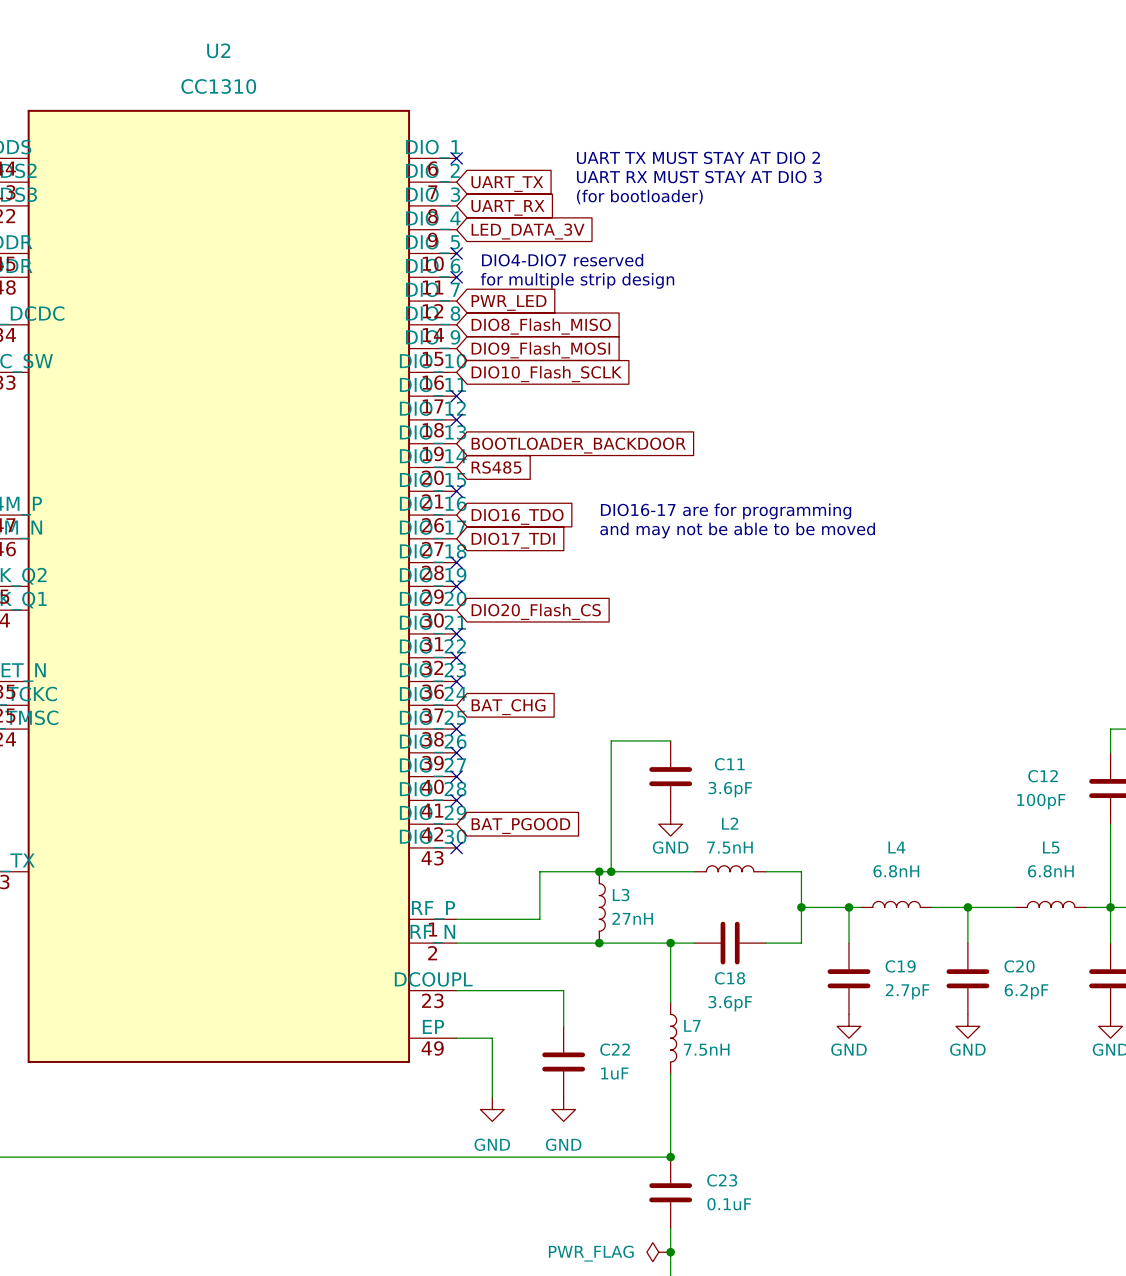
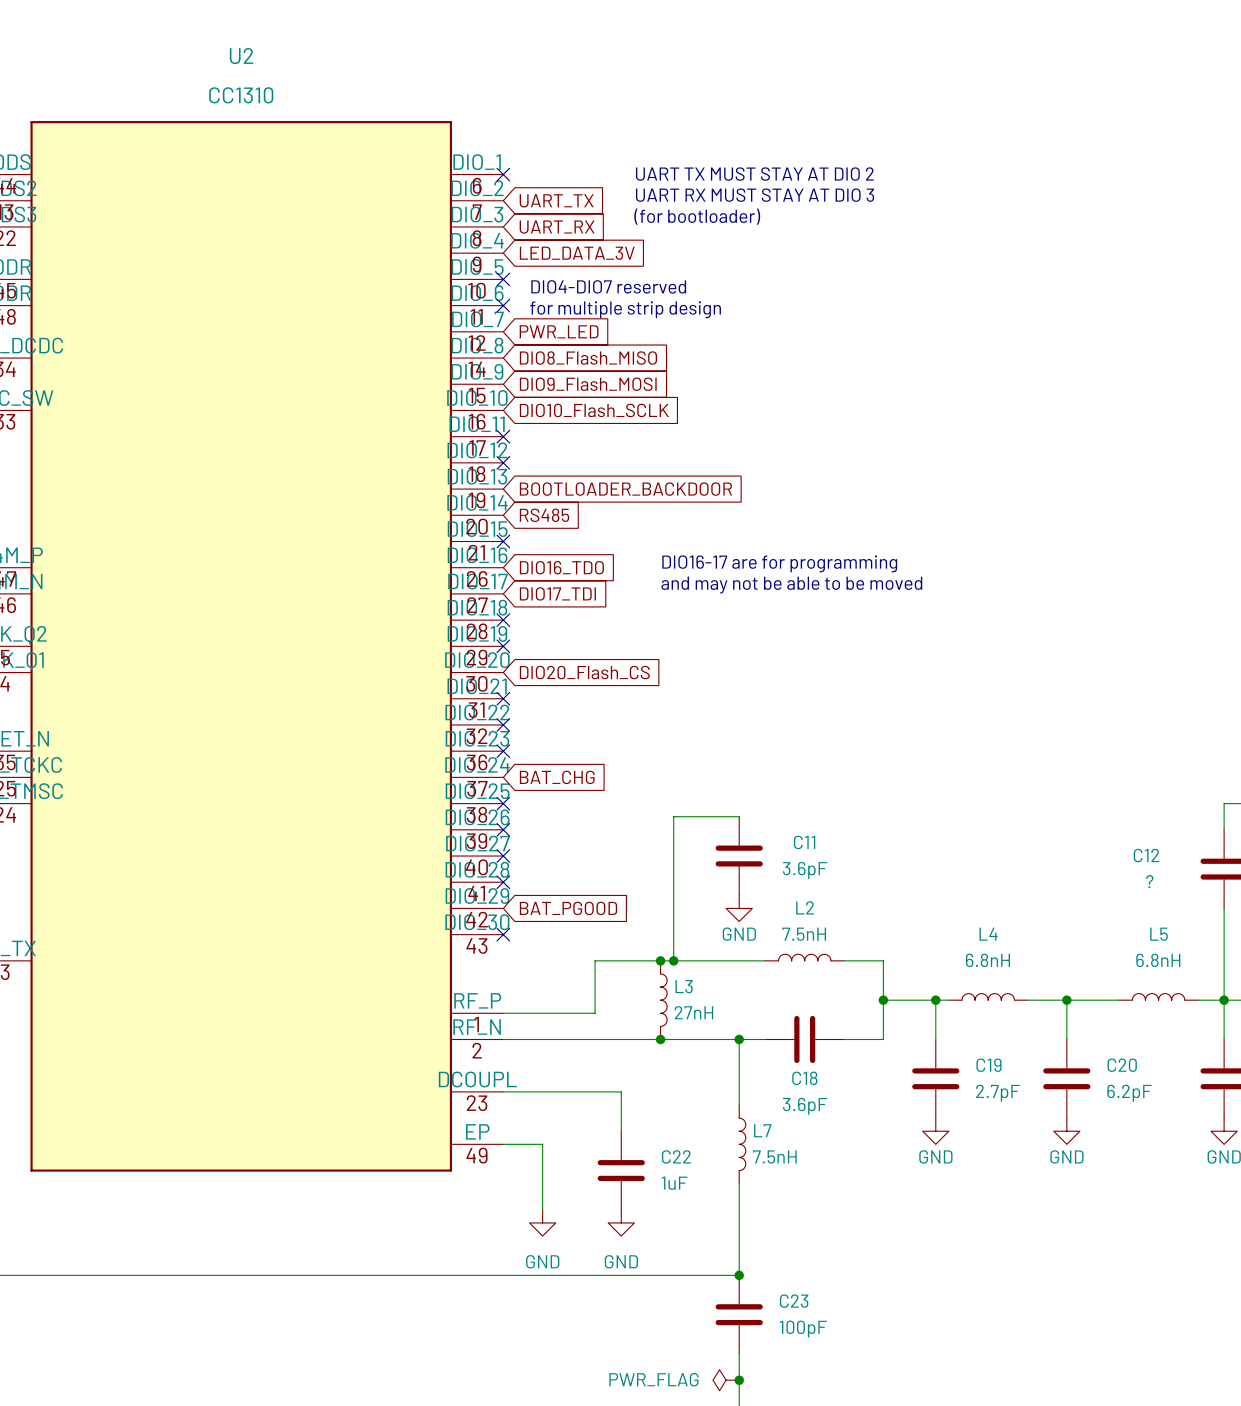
C12 value: 100pF (1041, 801) -> ? (1149, 881)
C23 value: 0.1uF (729, 1204) -> 100pF (803, 1329)

